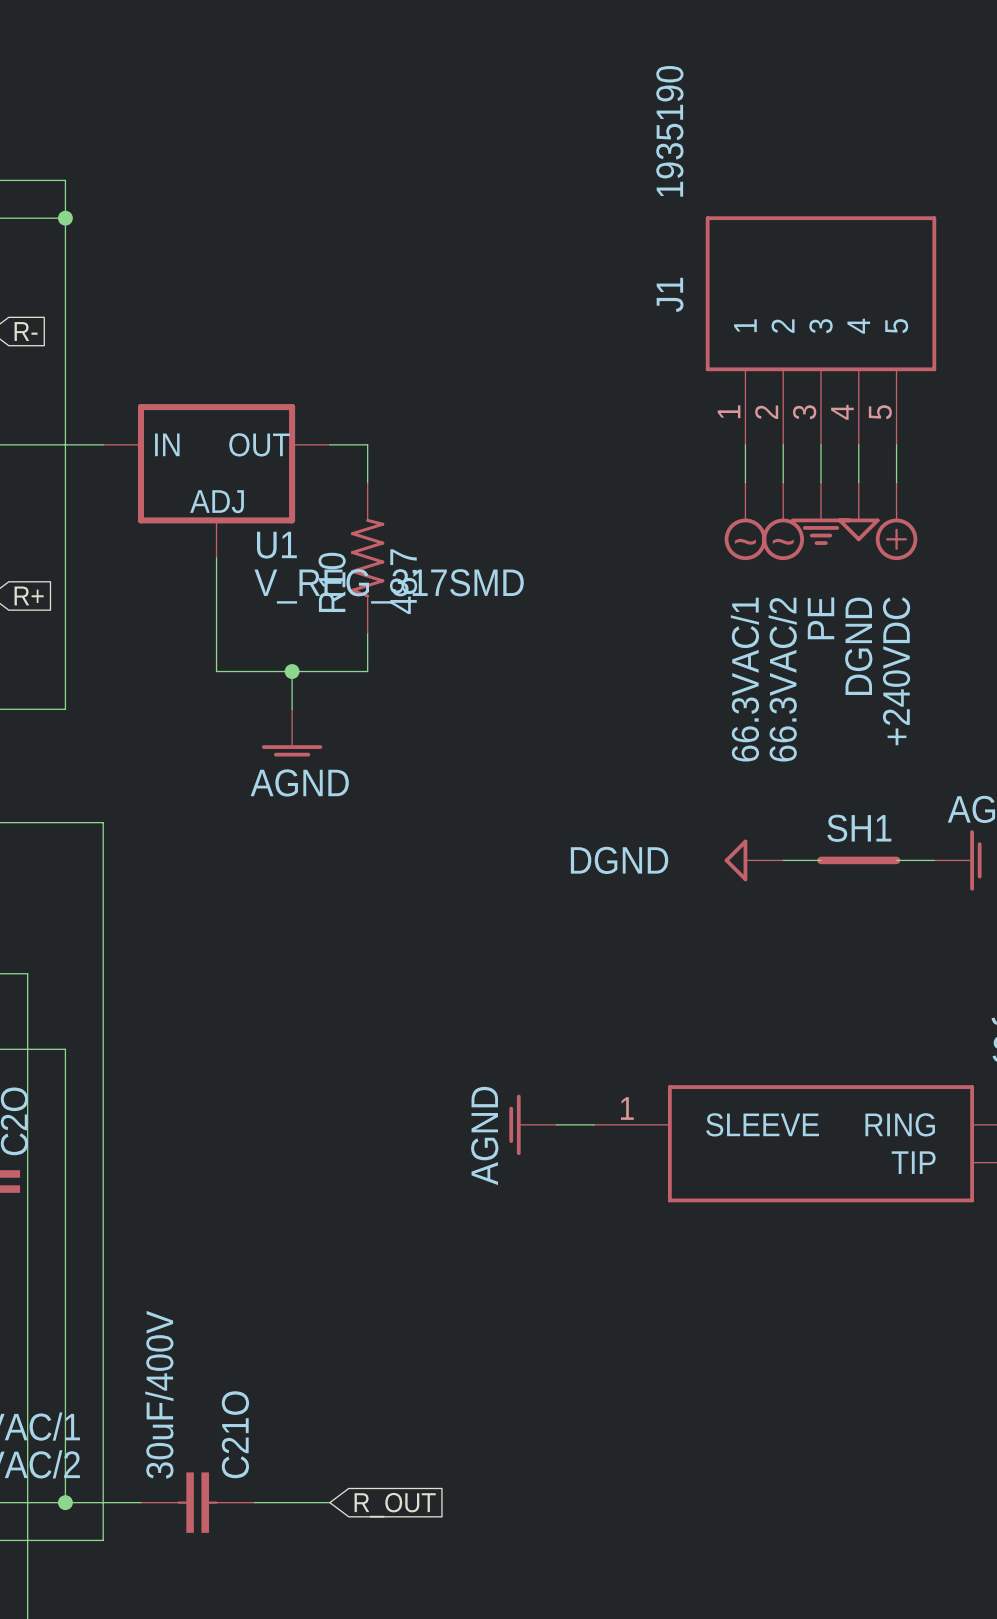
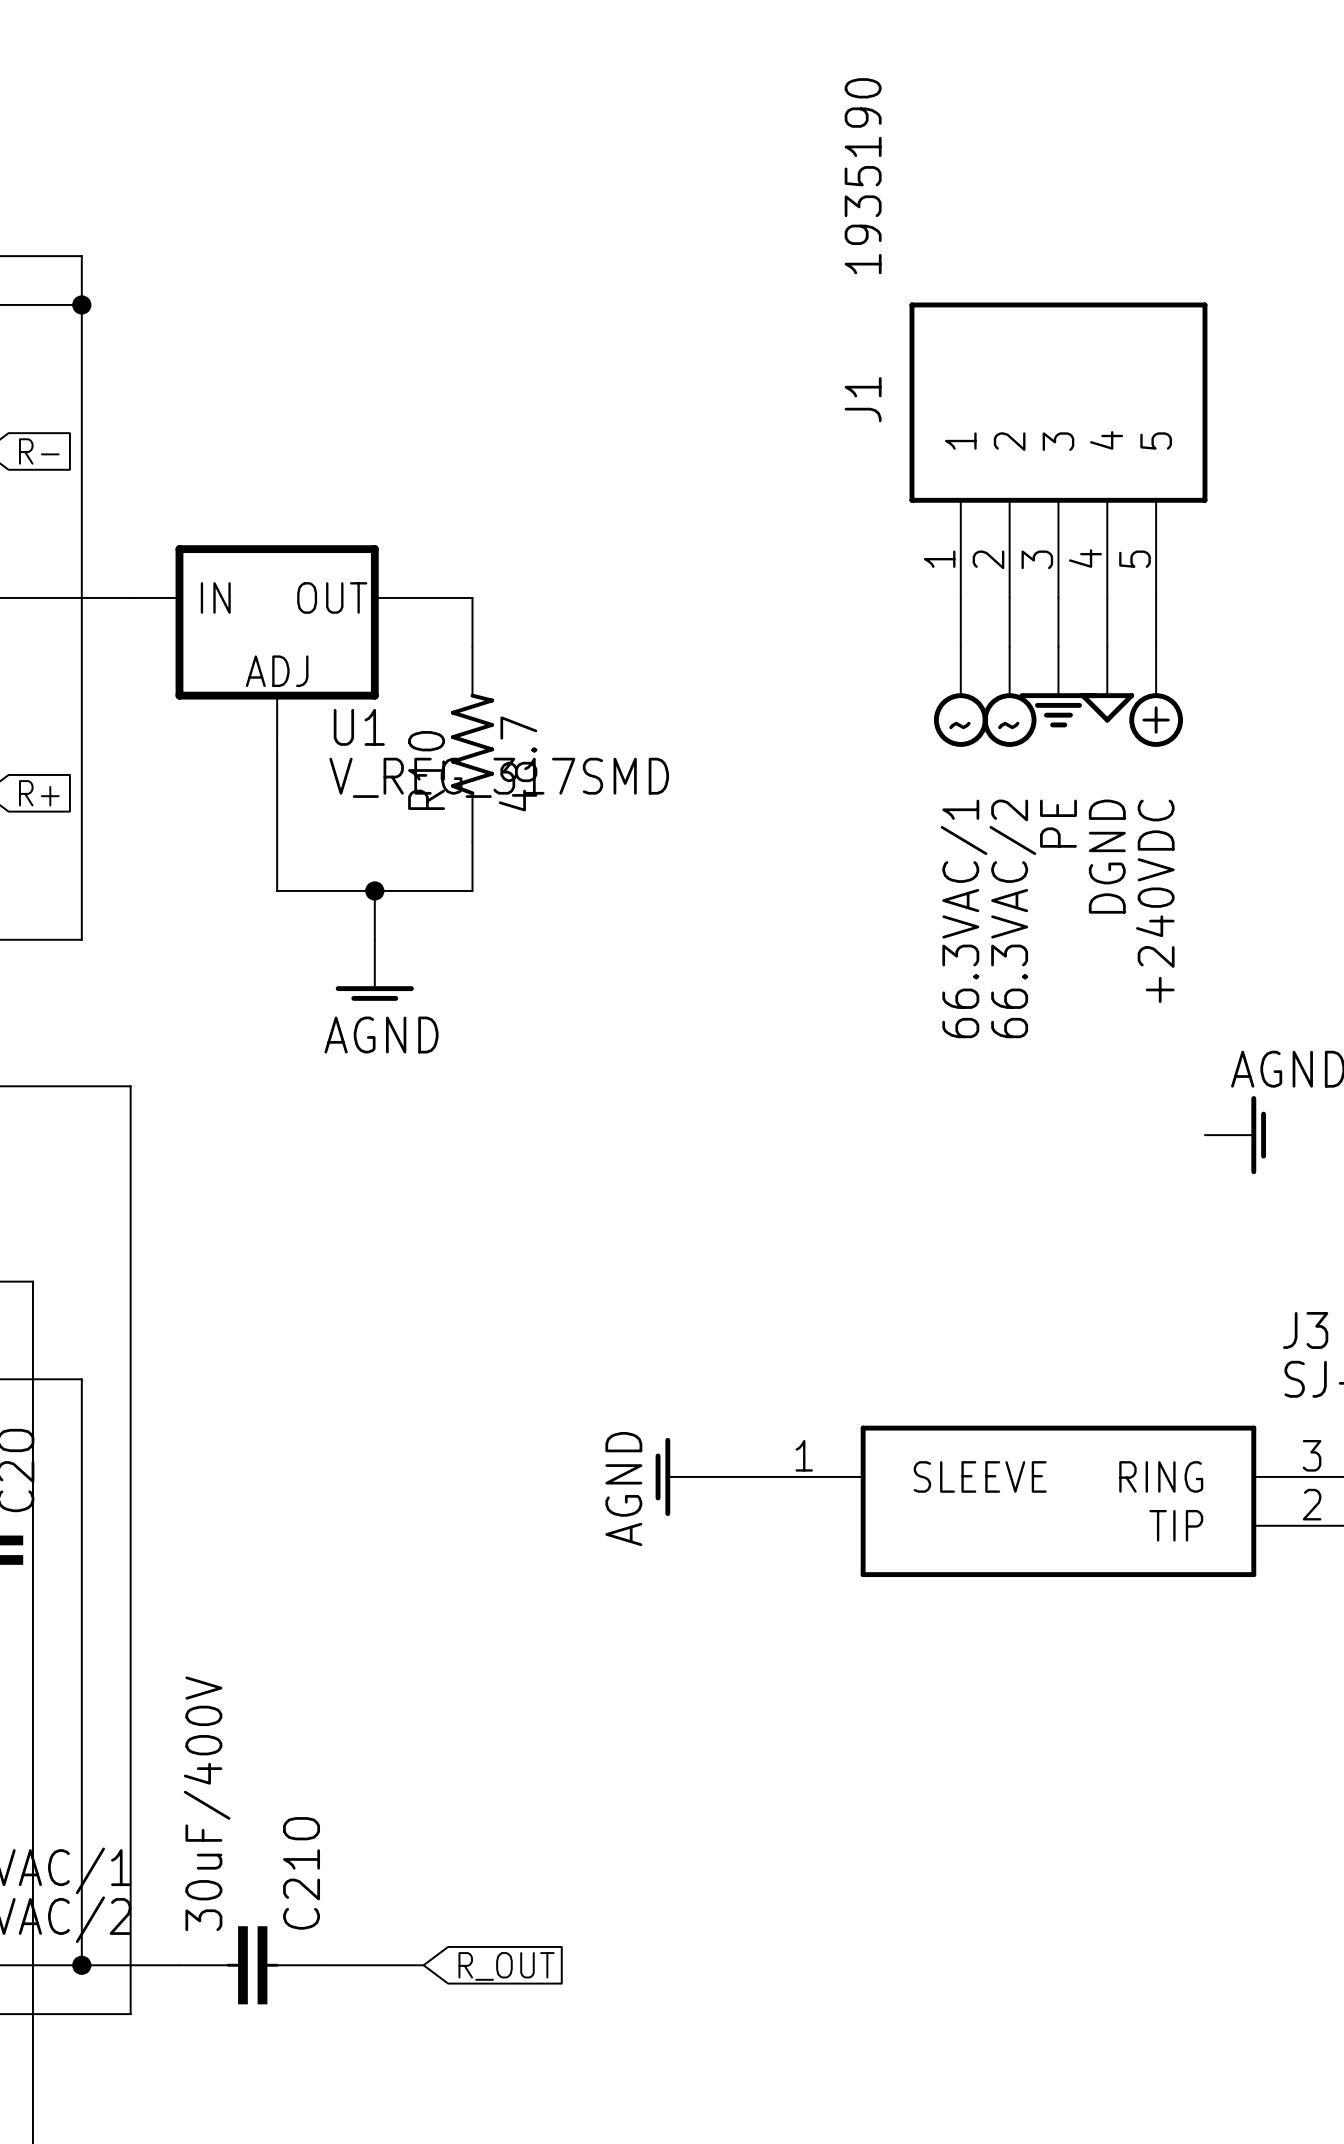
power symbol: DGND (753, 860) -> none
wire: (783, 860) (820, 860) -> none
SH1: (858, 860) -> none
wire: (896, 860) (934, 860) -> none

